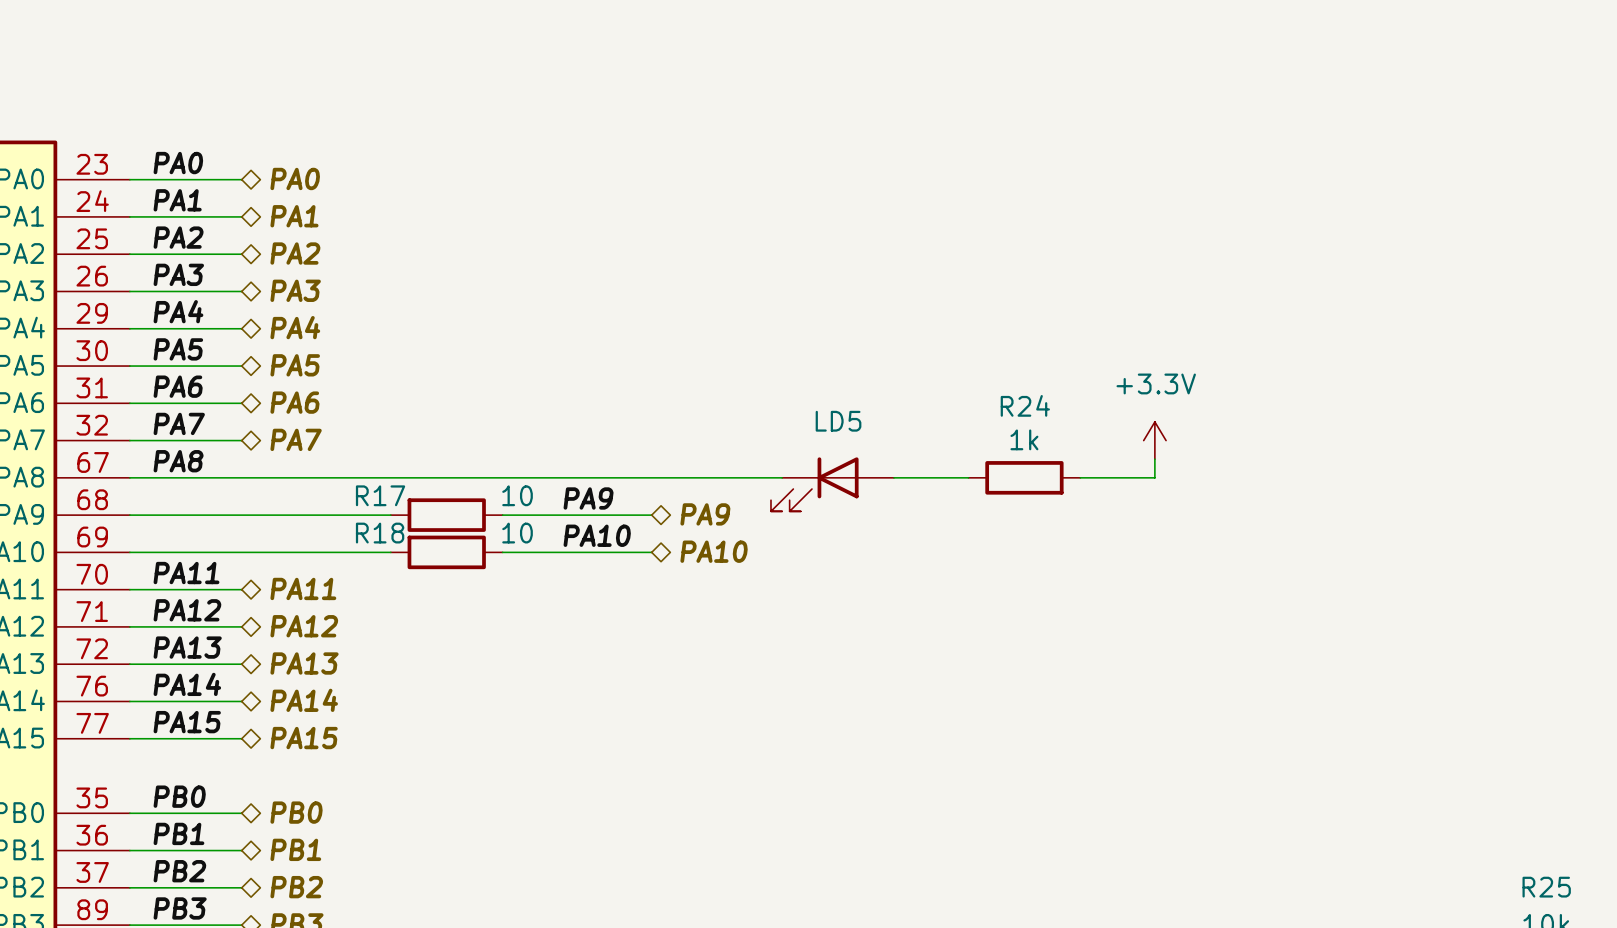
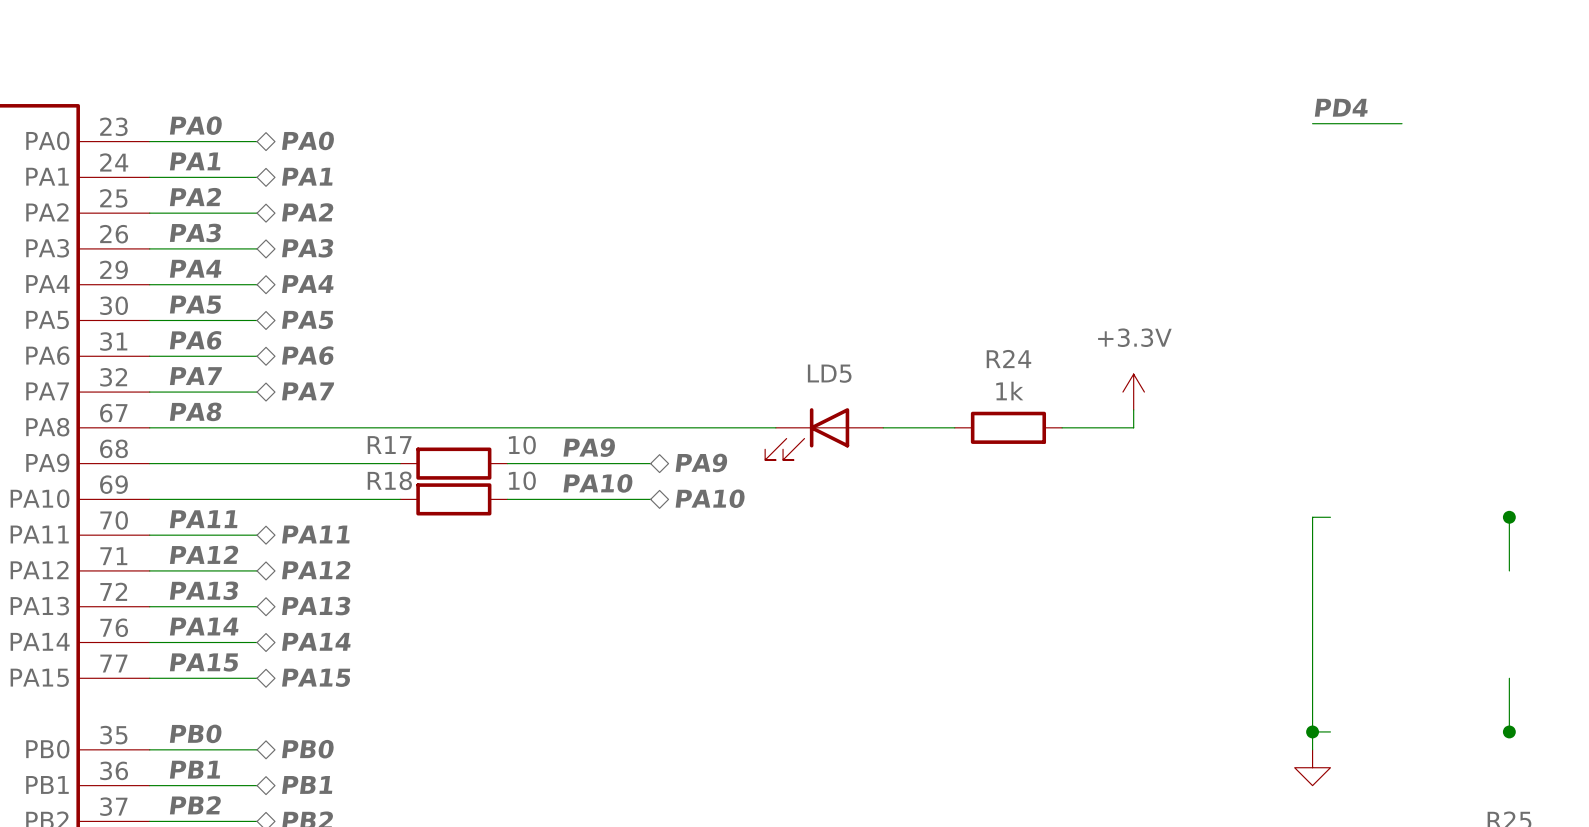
label: none -> PD4 (1341, 107)
wire: none -> (1312, 123) (1402, 123)
wire: none -> (1330, 517) (1312, 517) (1312, 749)
wire: none -> (1509, 517) (1509, 570)
junction: none -> (1509, 517)
wire: none -> (1509, 678) (1509, 731)
wire: none -> (1312, 731) (1330, 731)
junction: none -> (1312, 731)
junction: none -> (1509, 731)
power symbol: none -> (1312, 767)

